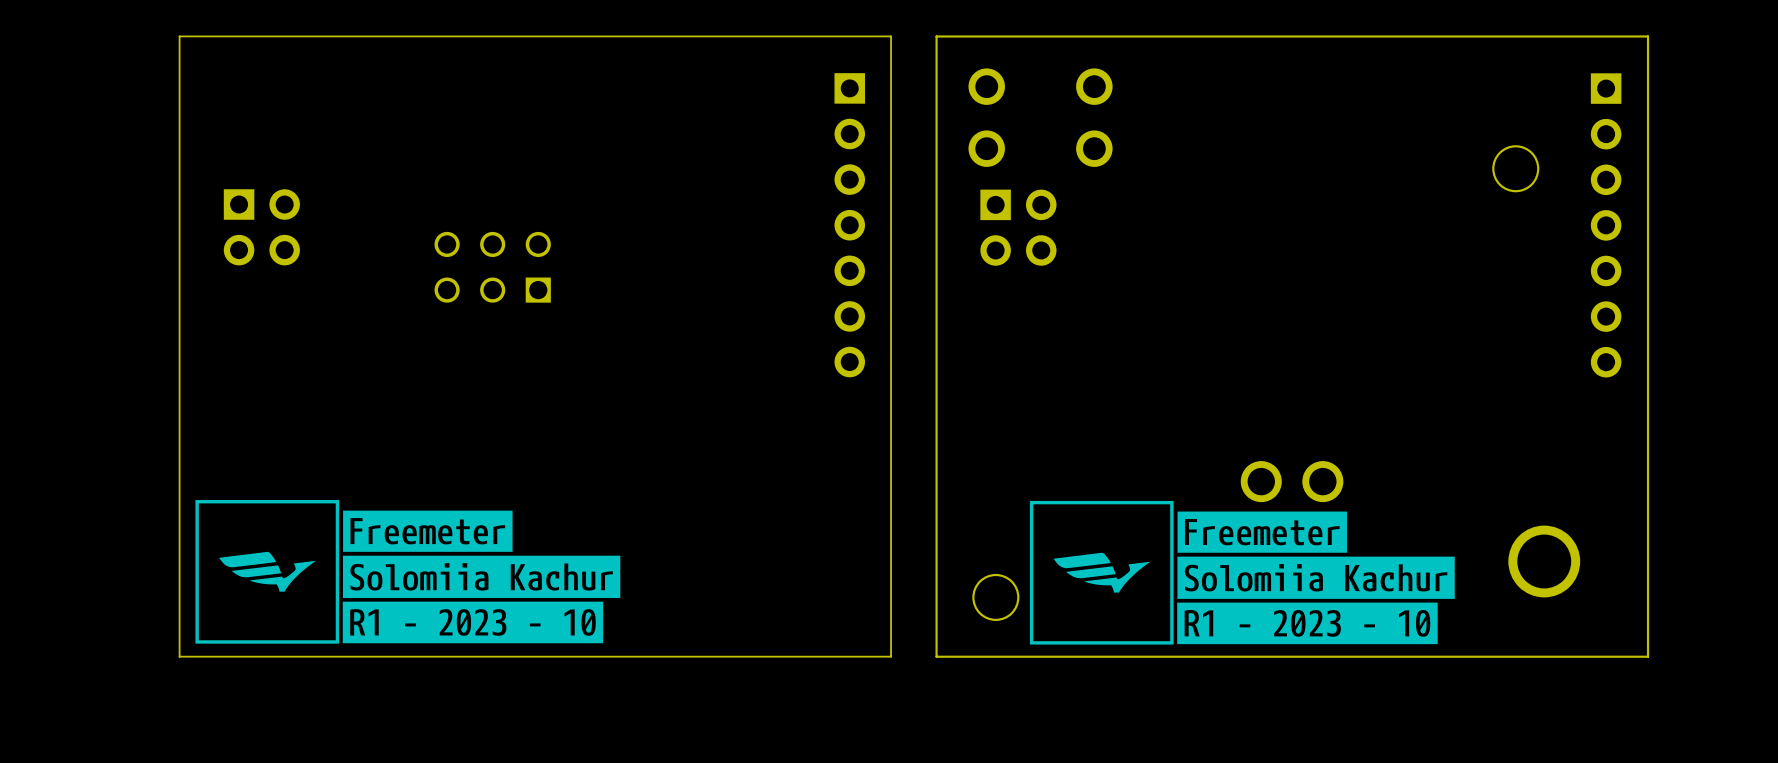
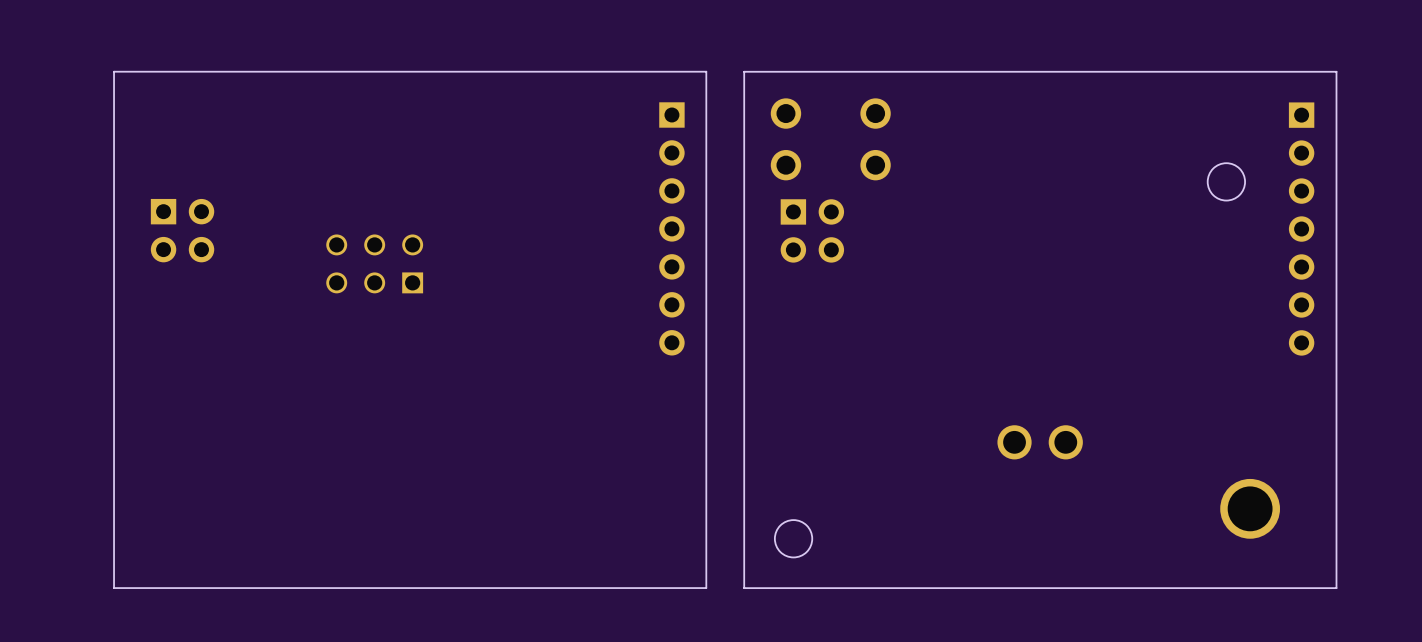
drawing: [195, 500, 621, 644] -> none
drawing: [1029, 500, 1455, 645] -> none

